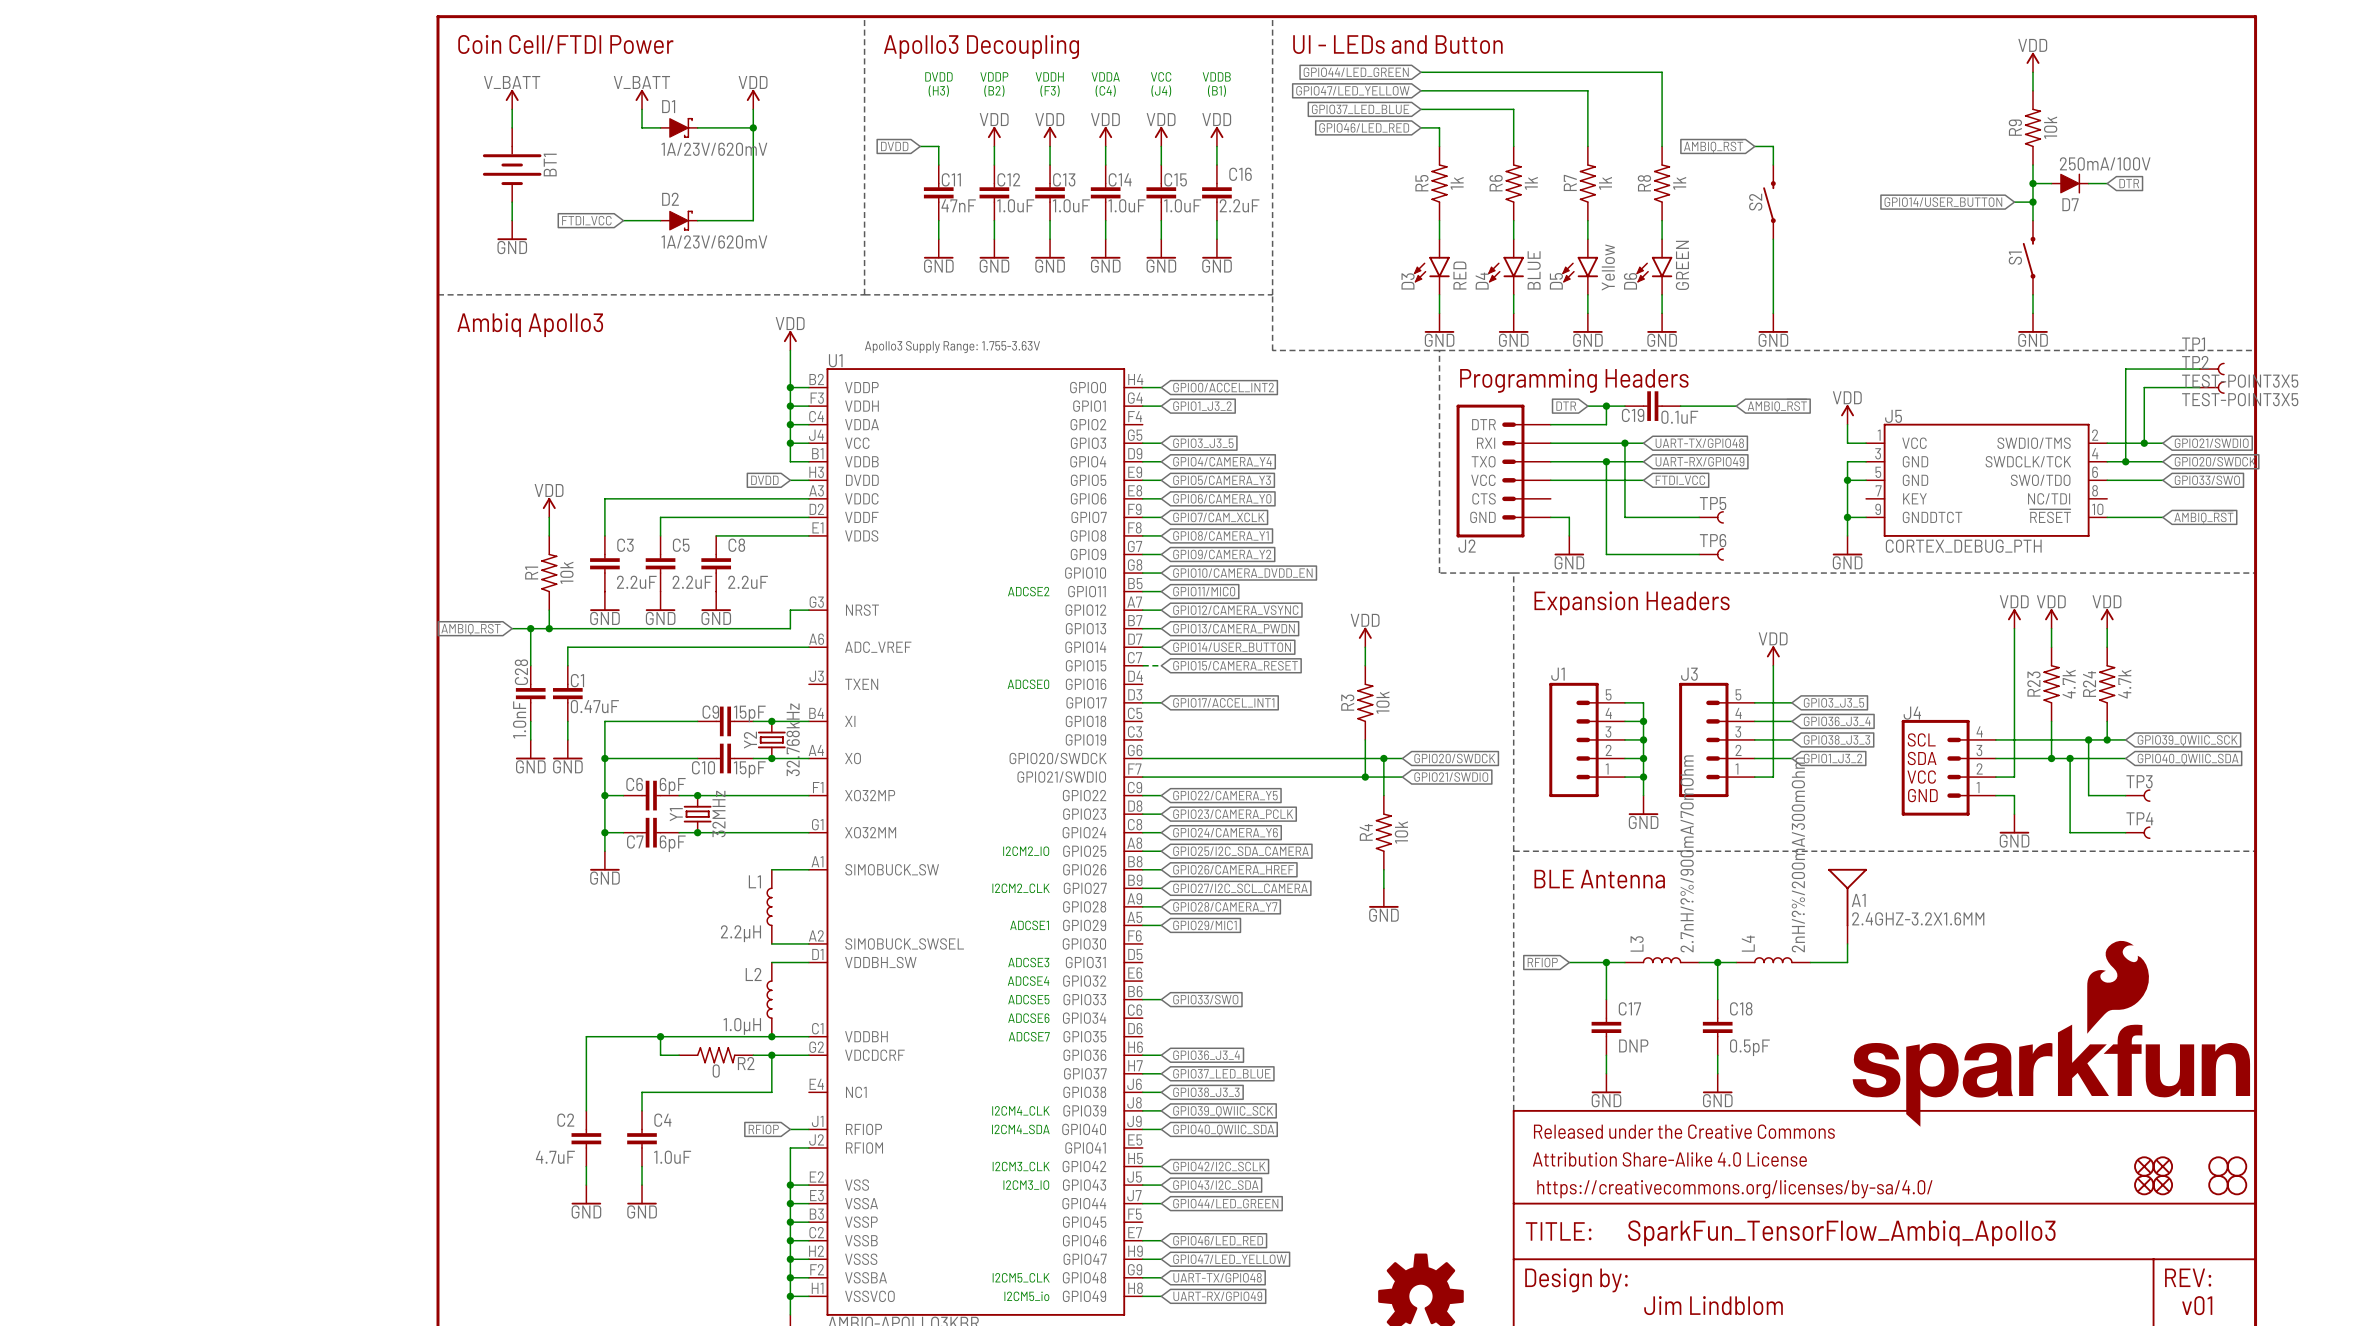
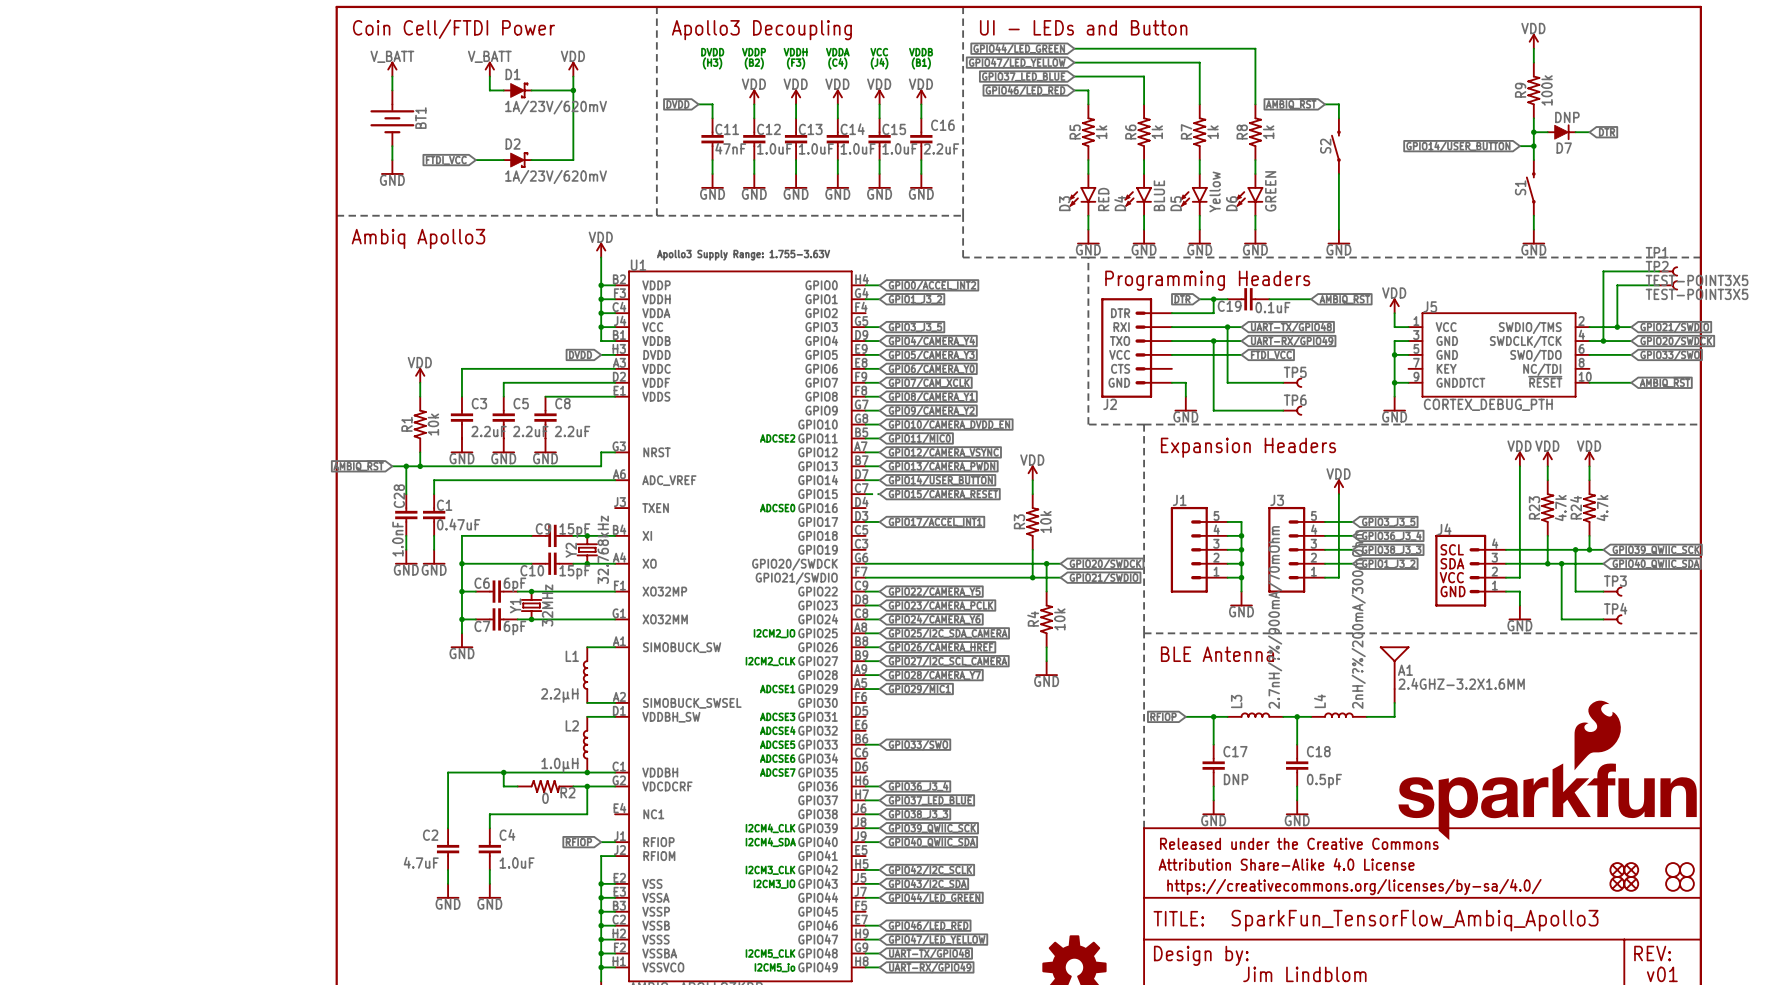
R9 value: 10k (2050, 127) -> 100k (1547, 90)
D7 value: 250mA/100V (2105, 163) -> DNP (1567, 117)

